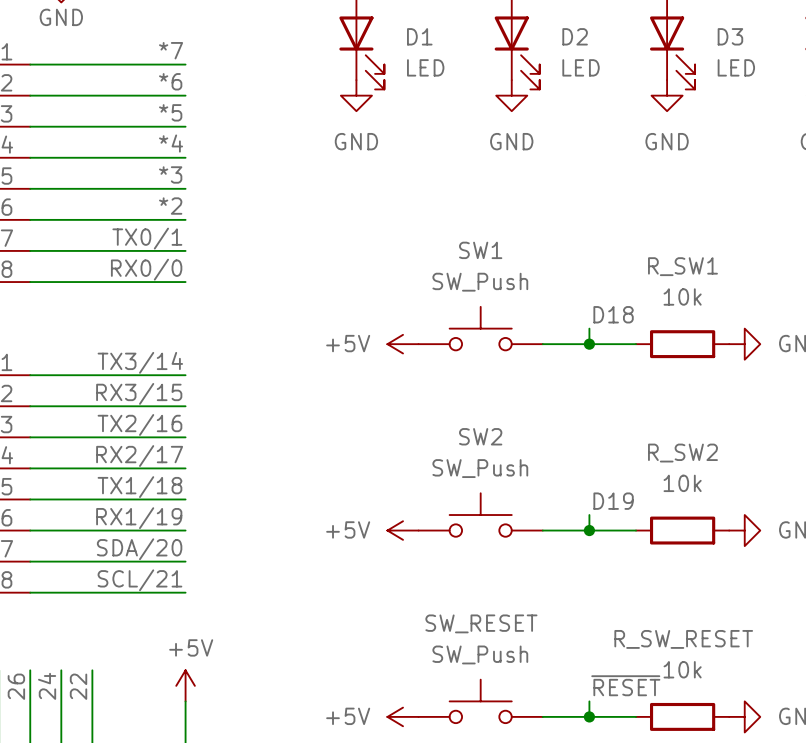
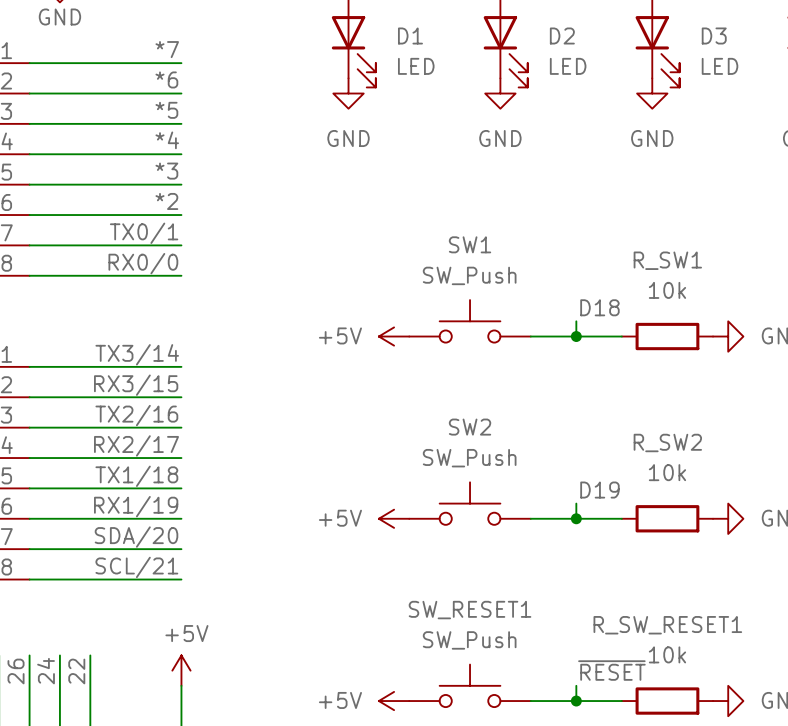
SW_RESET name: SW_RESET (481, 623) -> SW_RESET1 (470, 610)
R_SW_RESET name: R_SW_RESET (683, 639) -> R_SW_RESET1 (667, 625)

